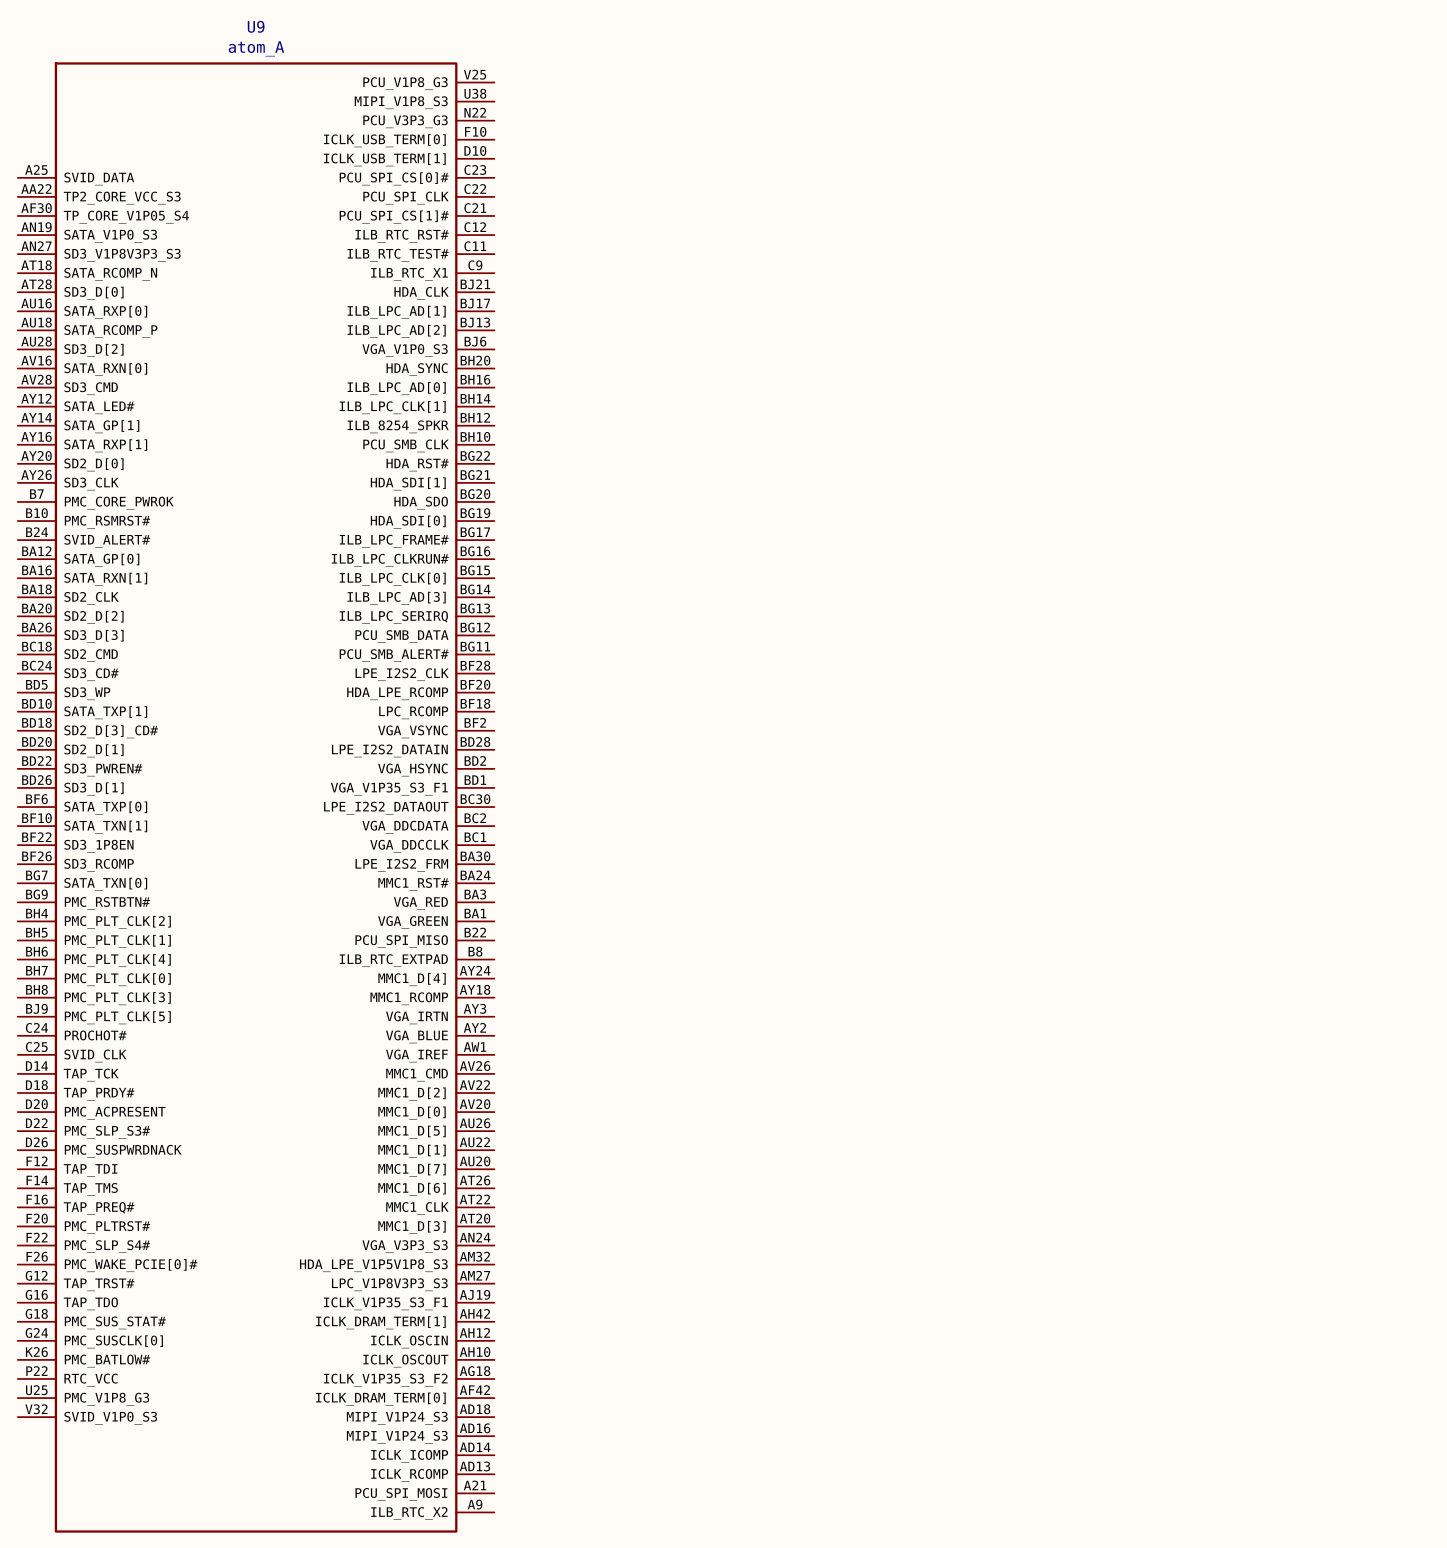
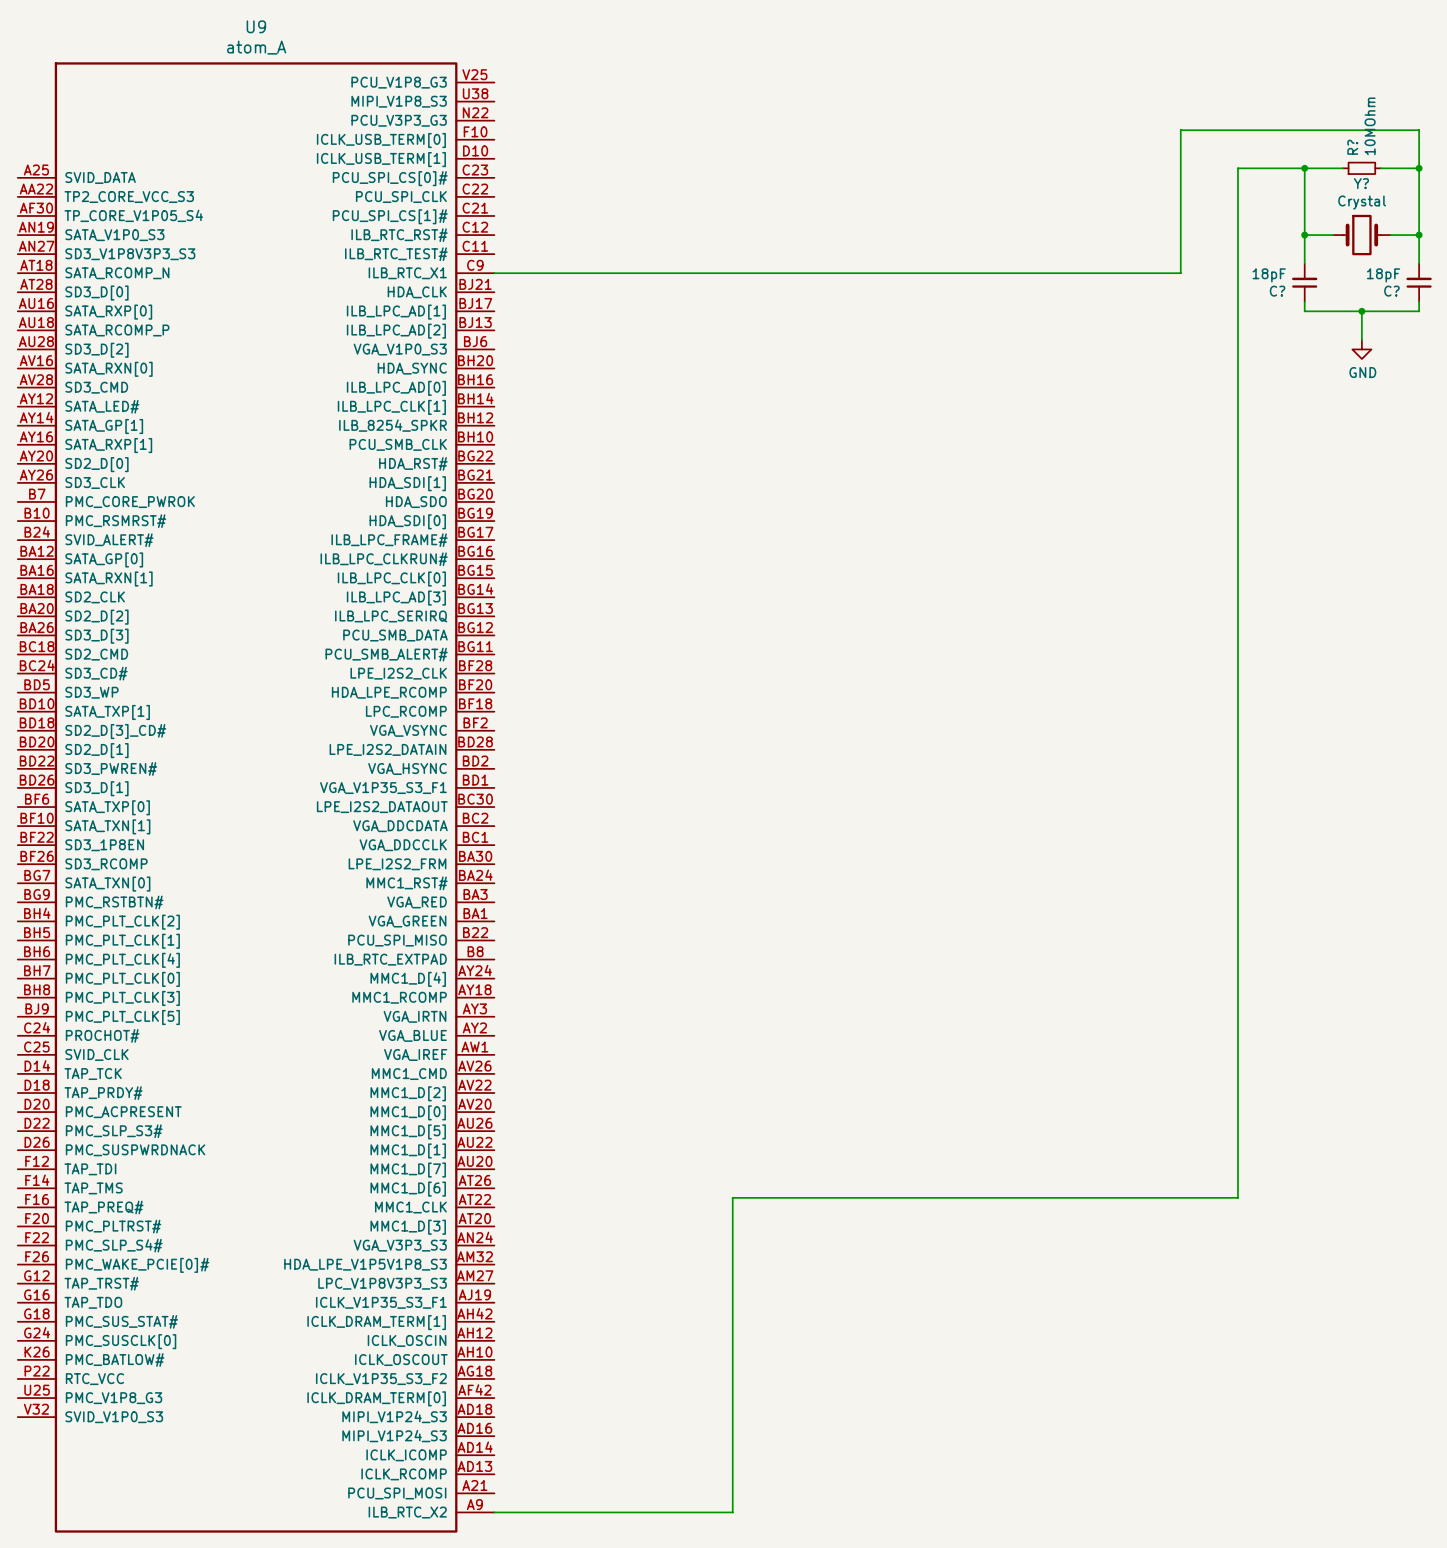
wire: none -> (1304, 168) (1304, 263)
junction: none -> (1304, 168)
wire: none -> (1342, 168) (1237, 168) (1237, 1197) (732, 1197) (732, 1512) (494, 1512)
R?: none -> 10MOhm (1361, 168)
wire: none -> (1380, 168) (1419, 168)
junction: none -> (1419, 168)
wire: none -> (1304, 235) (1333, 235)
junction: none -> (1304, 235)
Y?: none -> Crystal (1361, 235)
wire: none -> (1390, 235) (1419, 235)
junction: none -> (1419, 235)
wire: none -> (1419, 263) (1419, 130) (1180, 130) (1180, 273) (494, 273)
C?: none -> 18pF (1304, 282)
C?: none -> 18pF (1419, 282)
wire: none -> (1304, 301) (1304, 311) (1419, 311) (1419, 301)
wire: none -> (1361, 311) (1361, 339)
junction: none -> (1361, 311)
power symbol: none -> GND (1361, 349)

